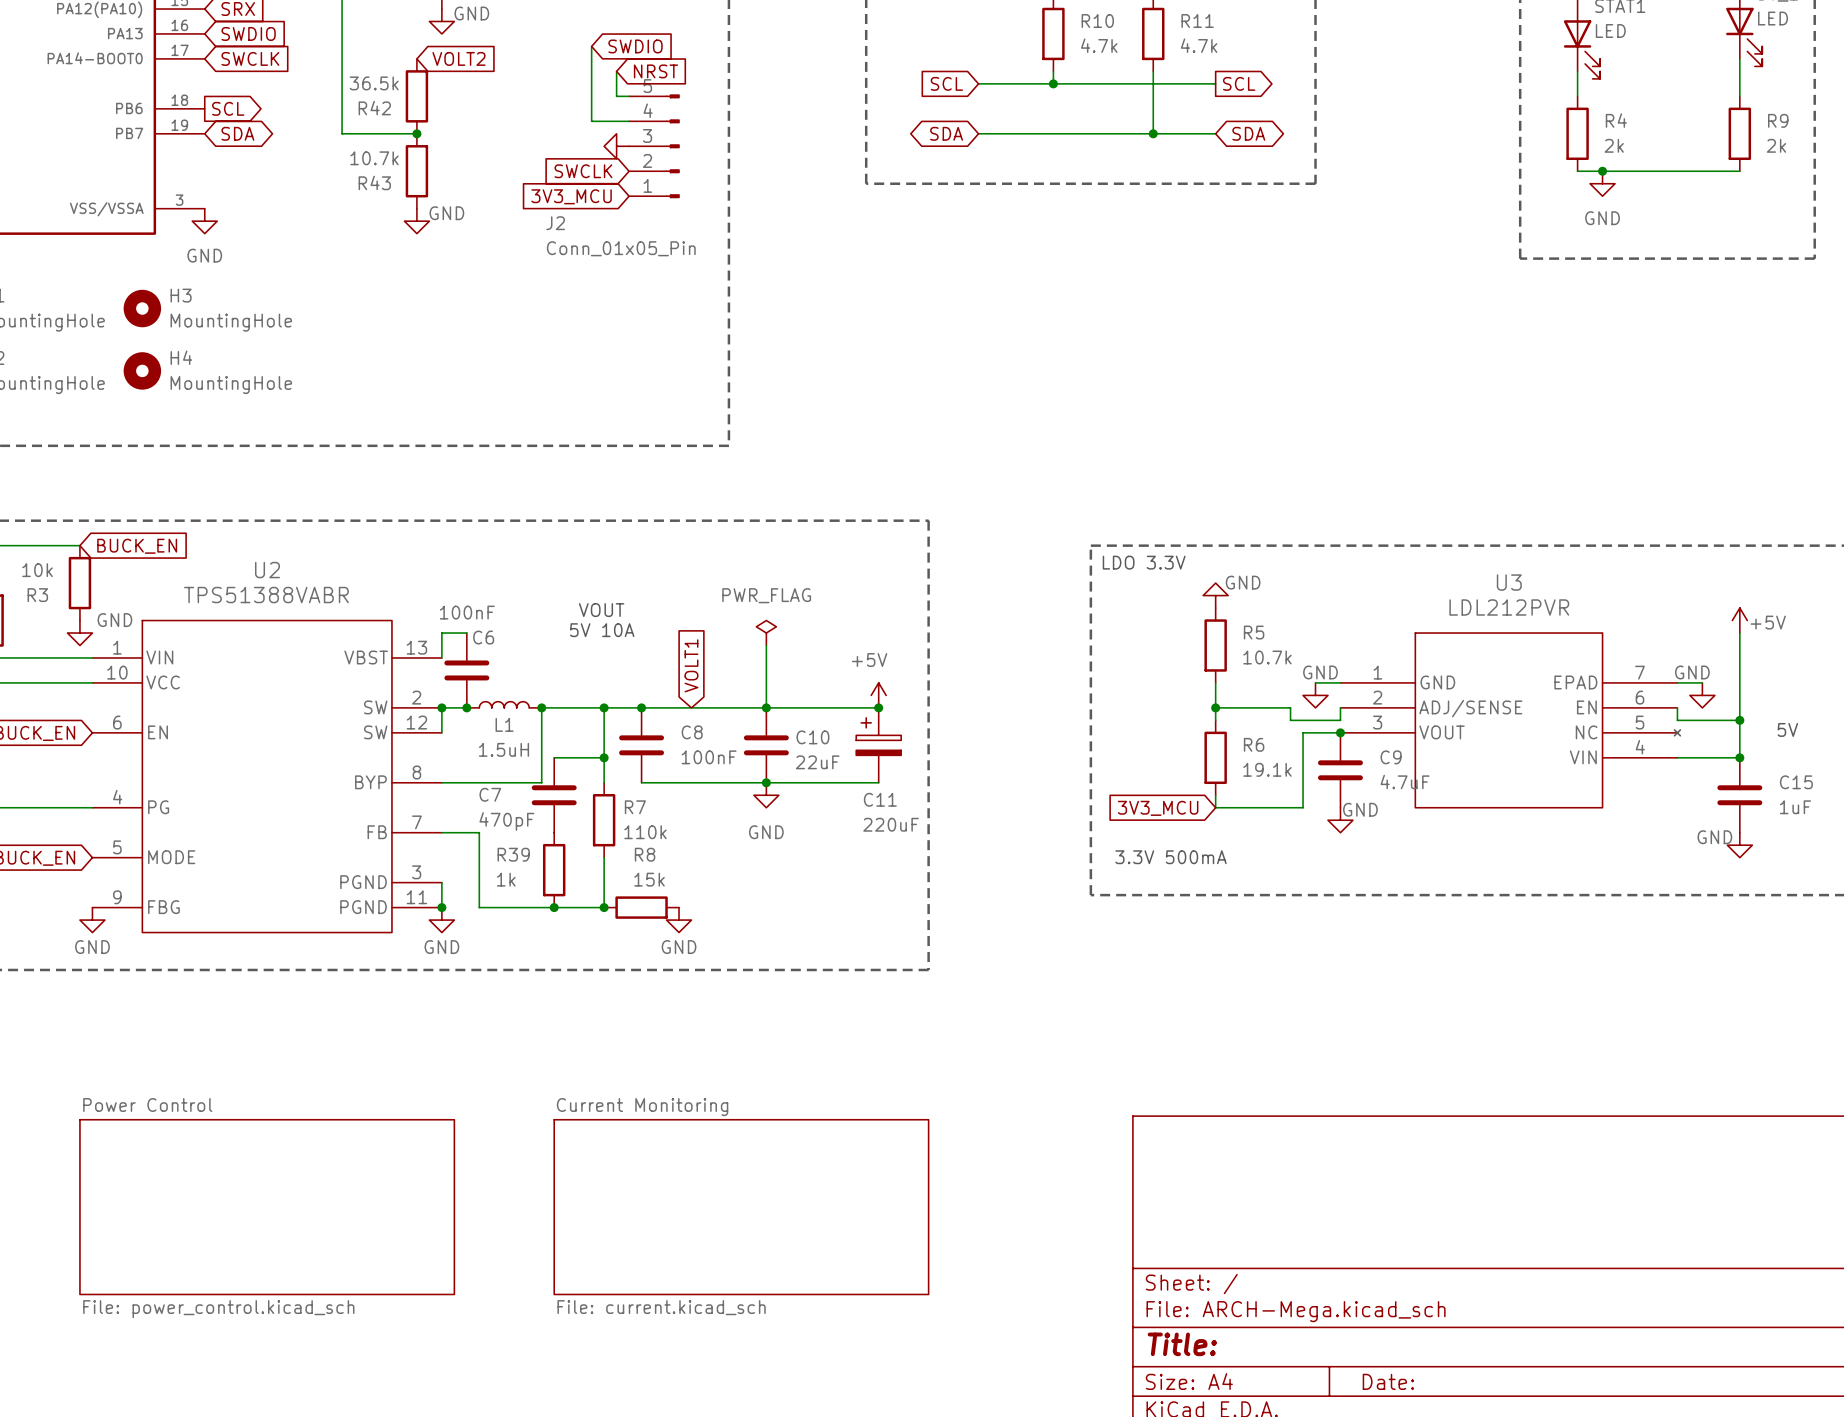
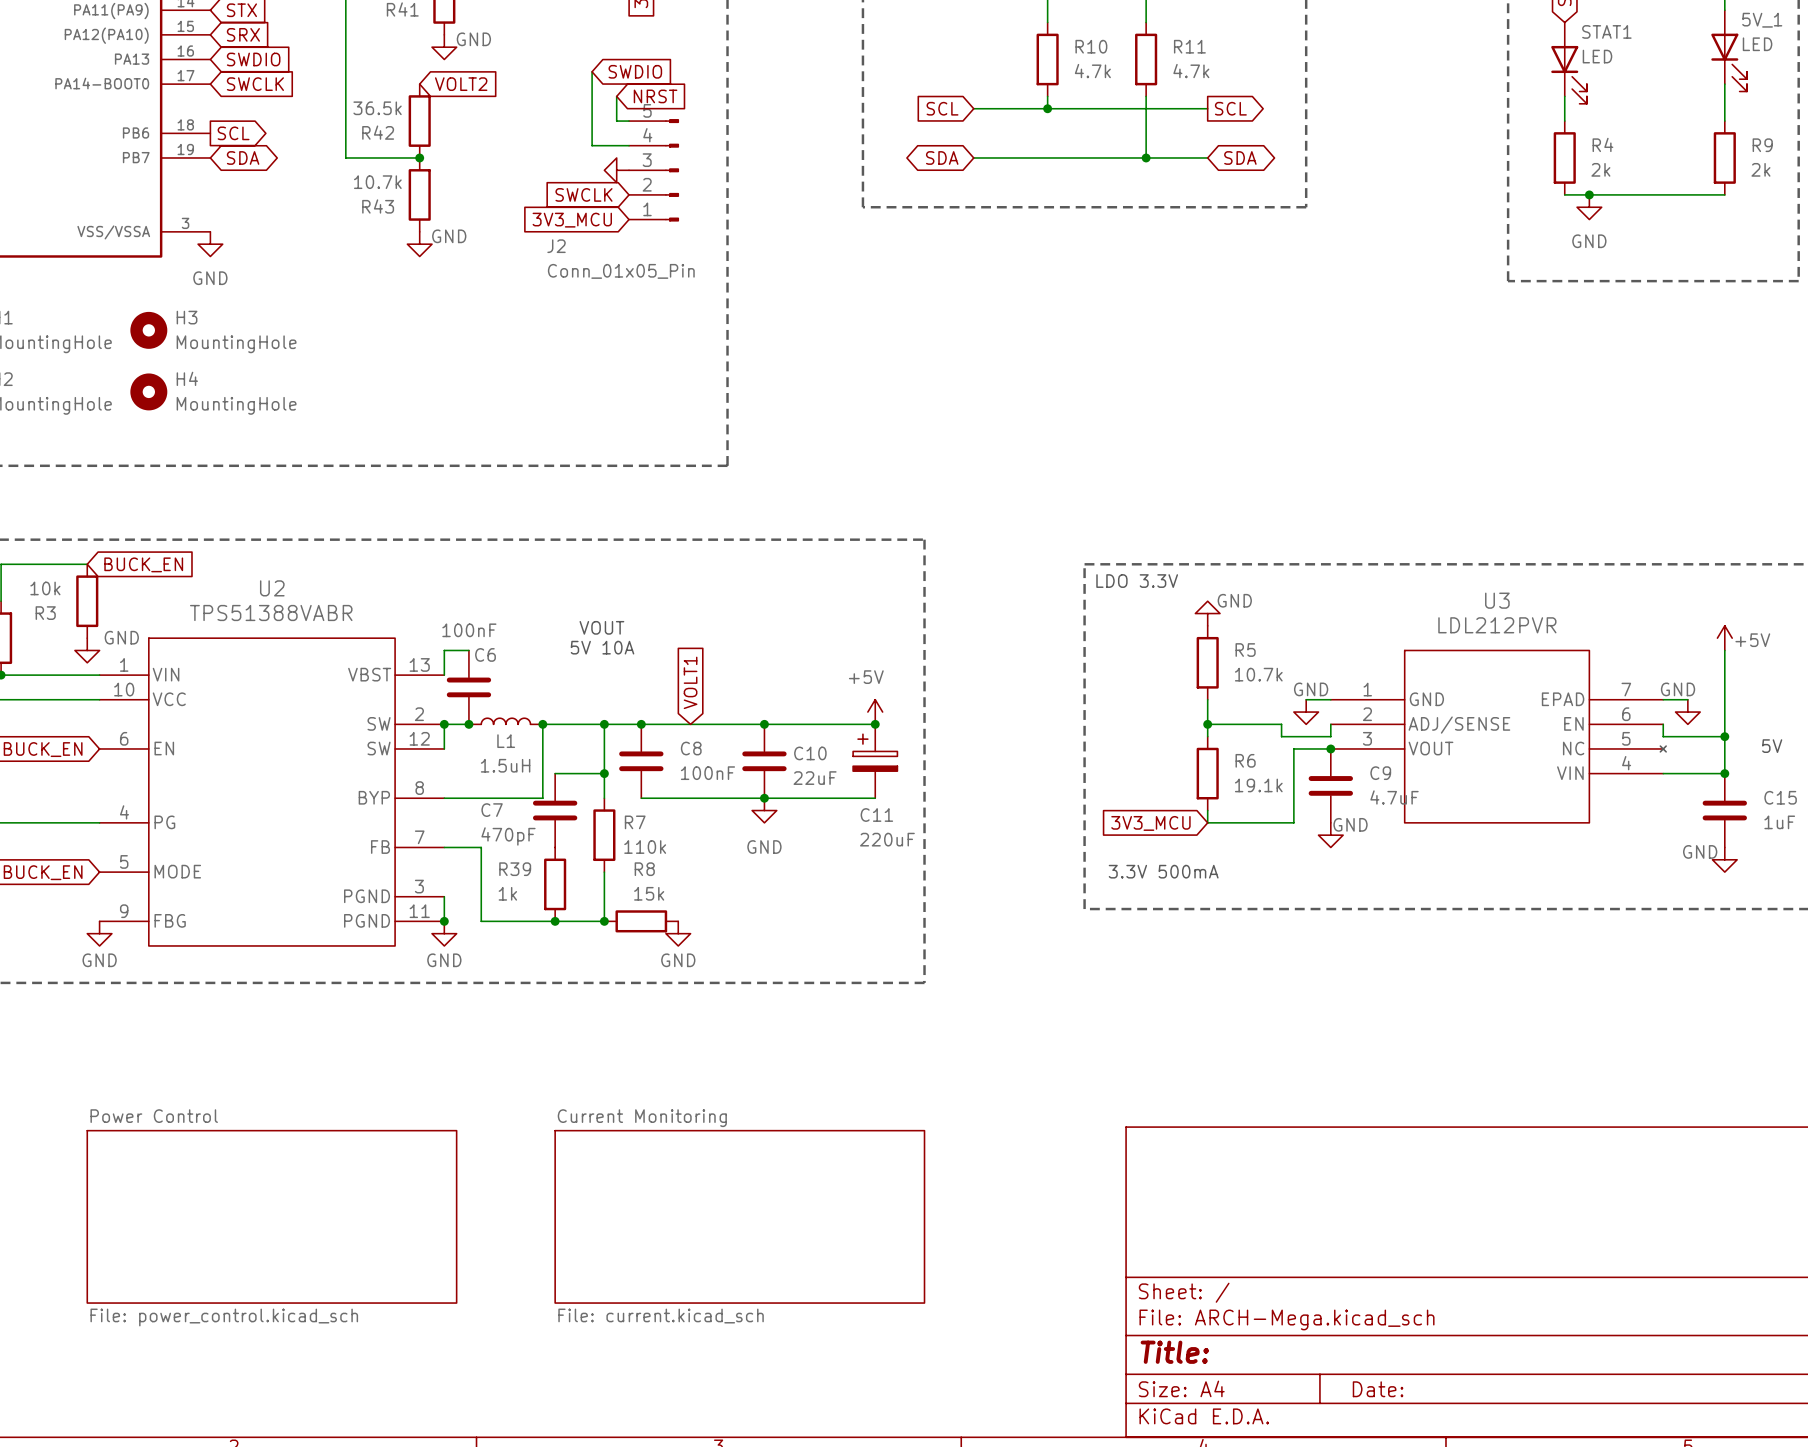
power symbol: PWR_FLAG (766, 633) -> none
wire: (766, 645) (766, 707) -> none

